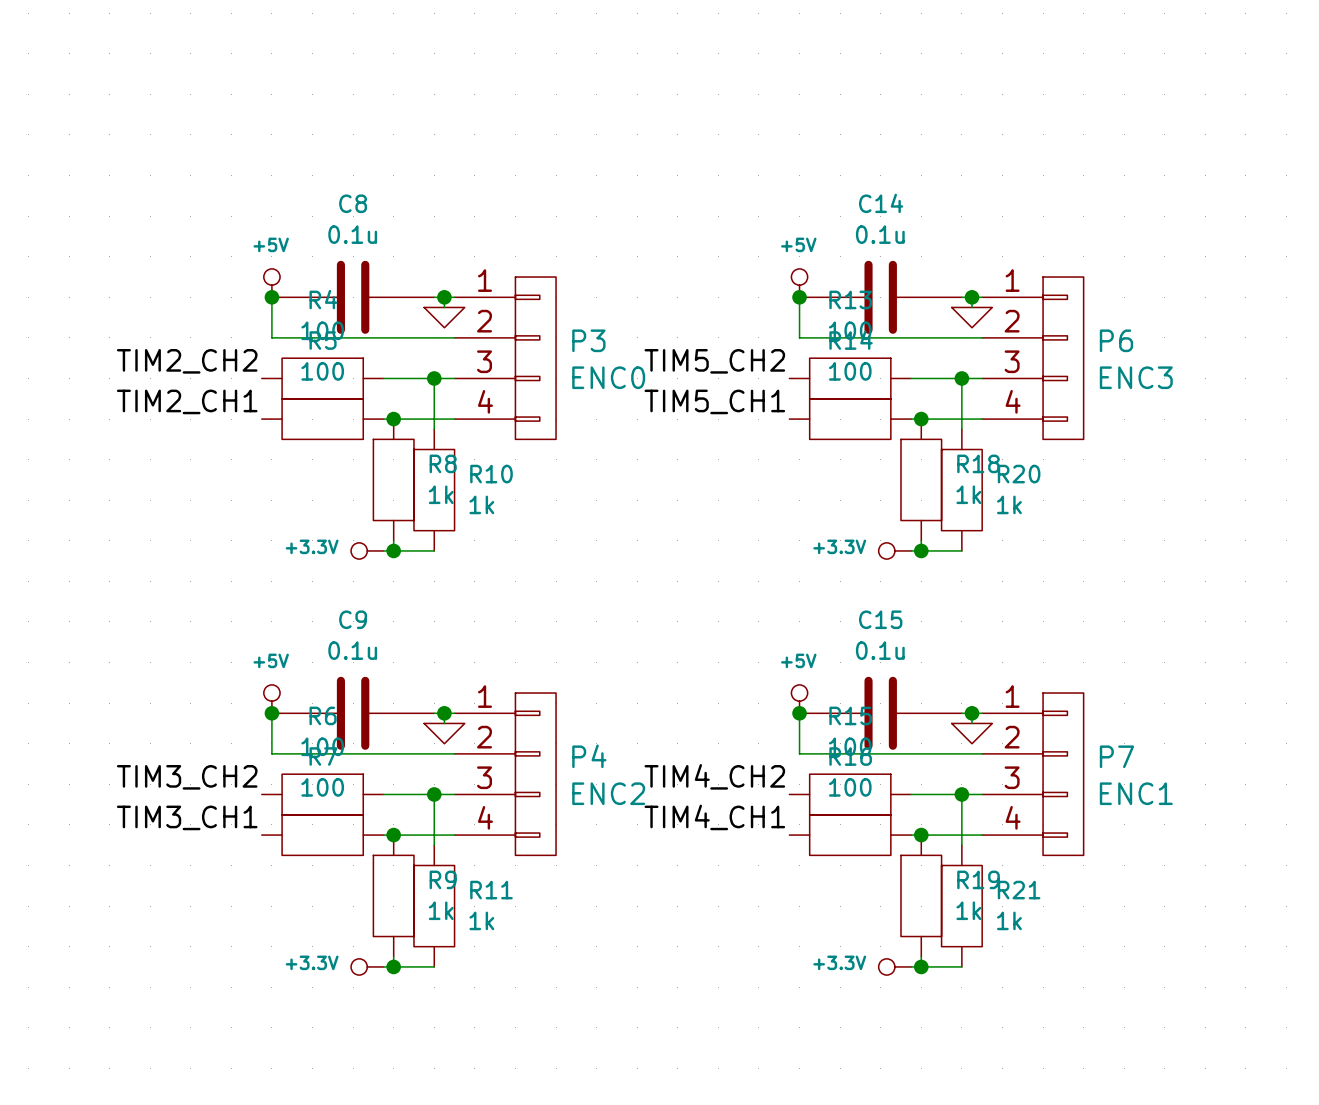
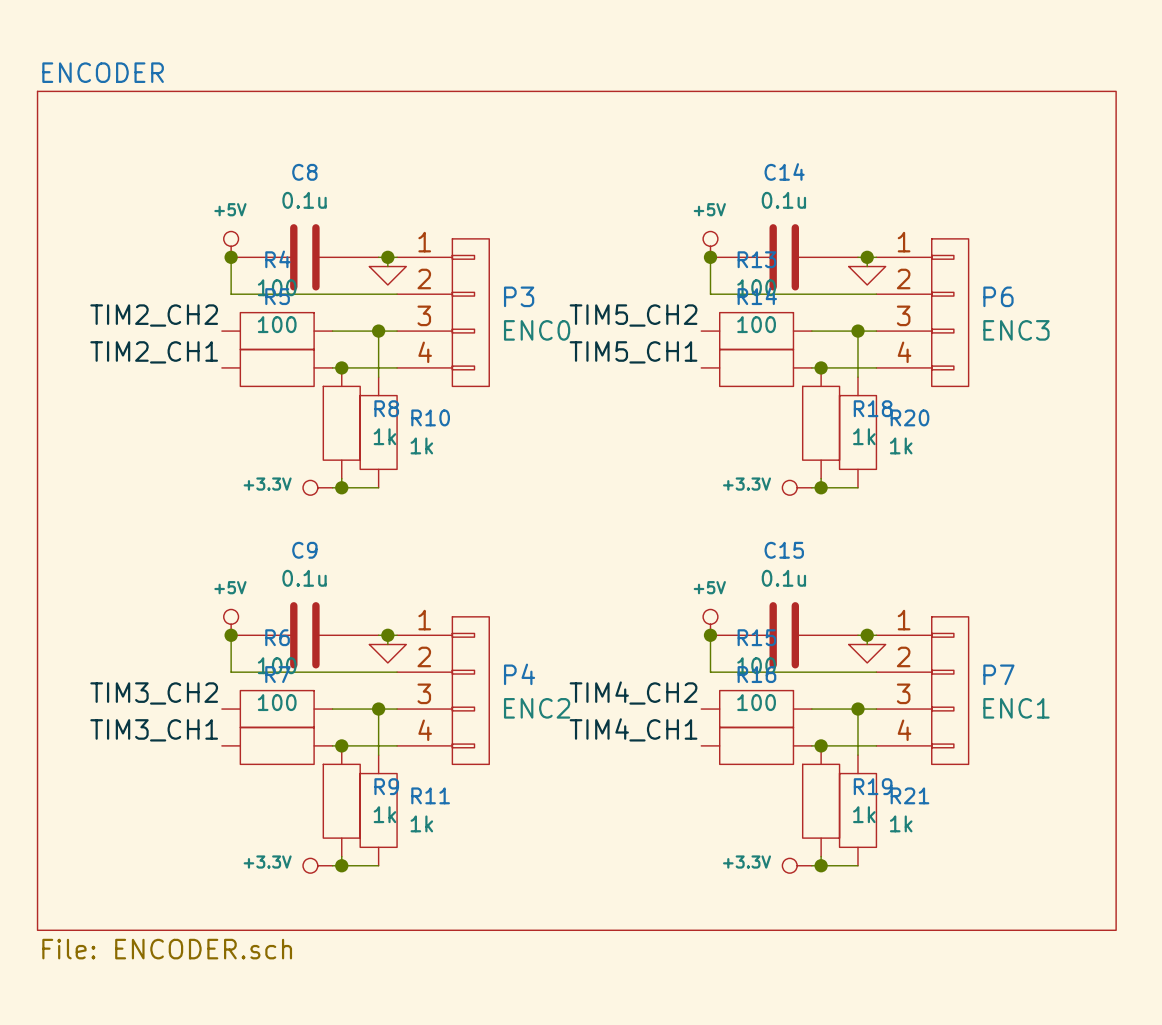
sheet ENCODER: none -> File: ENCODER.sch (576, 510)

